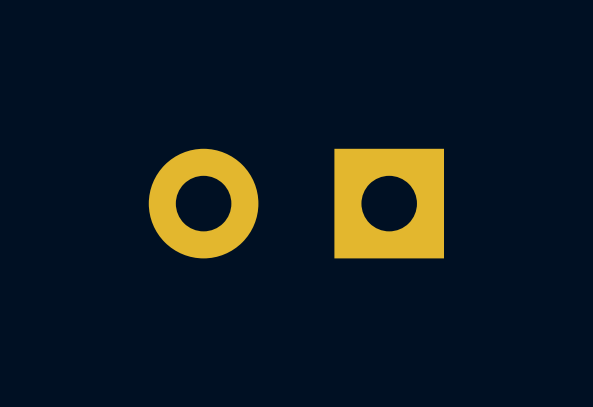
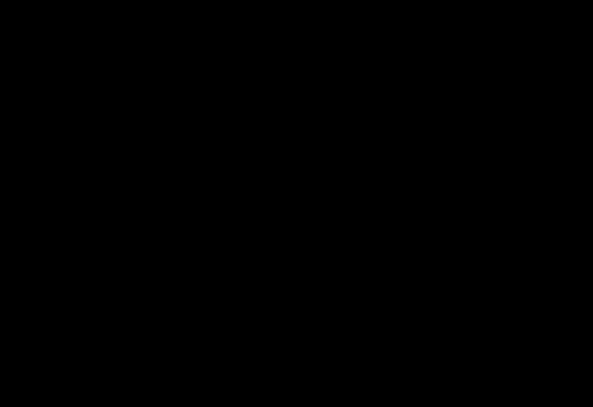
part: (296, 203) -> none

